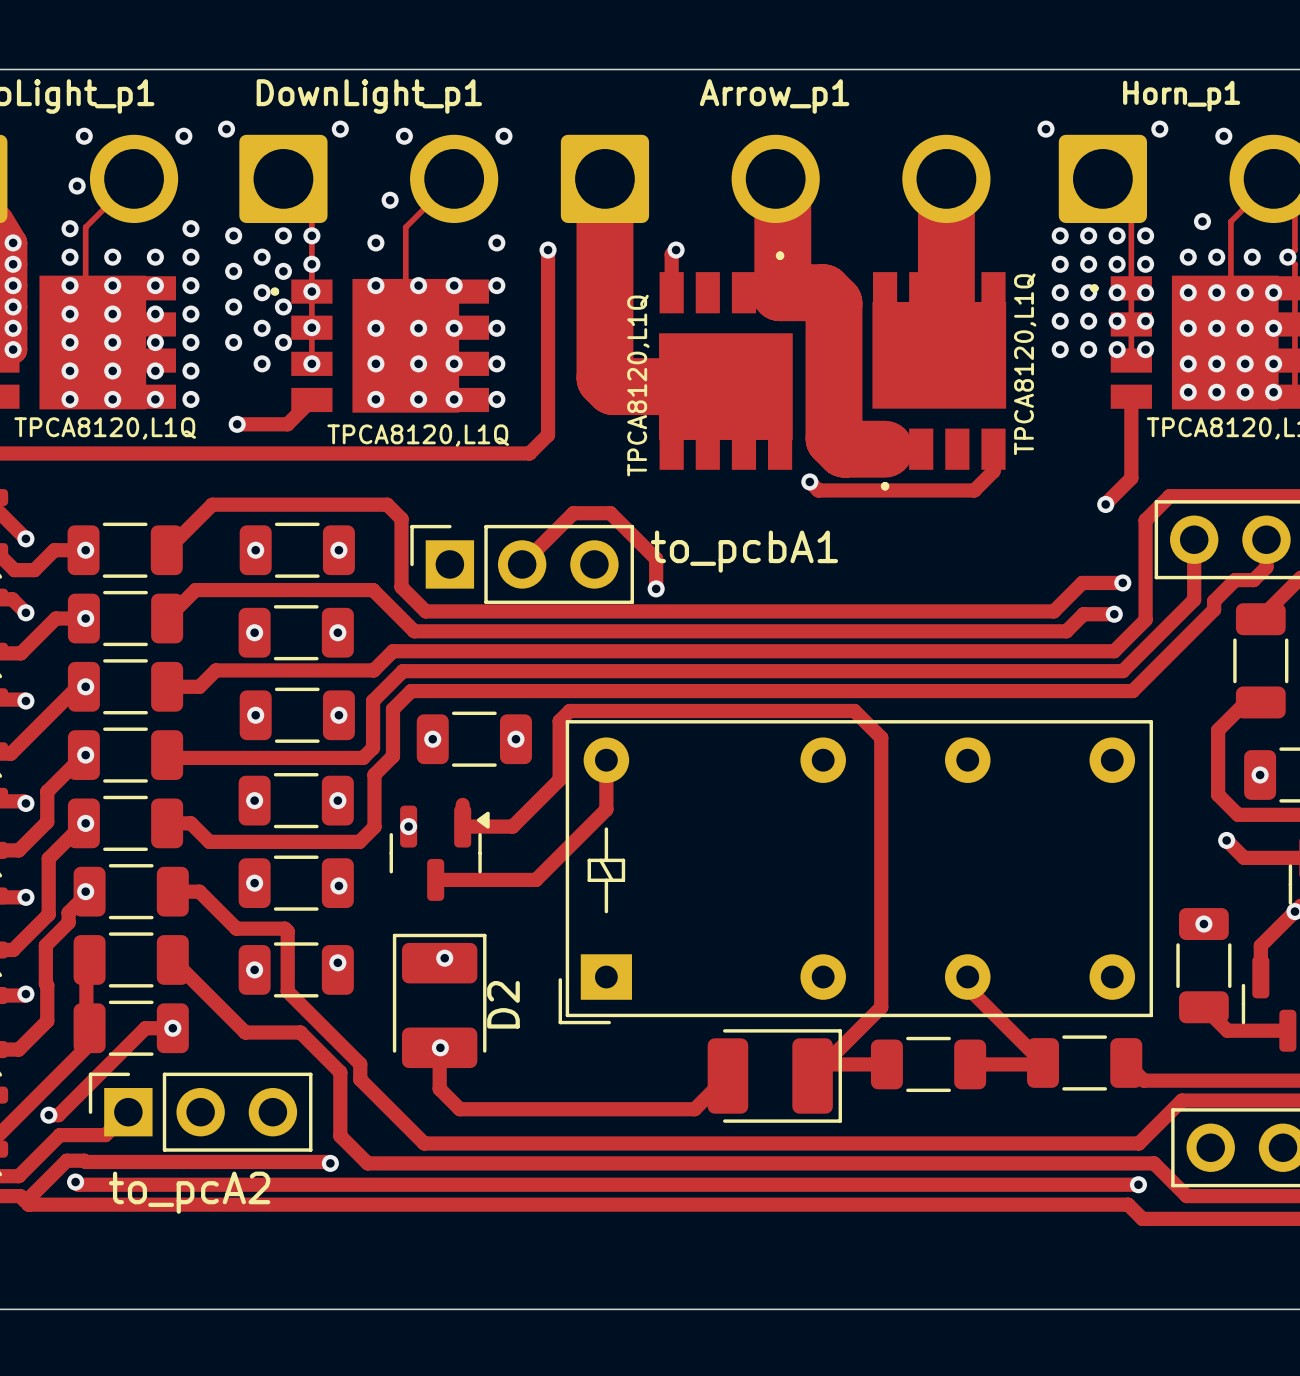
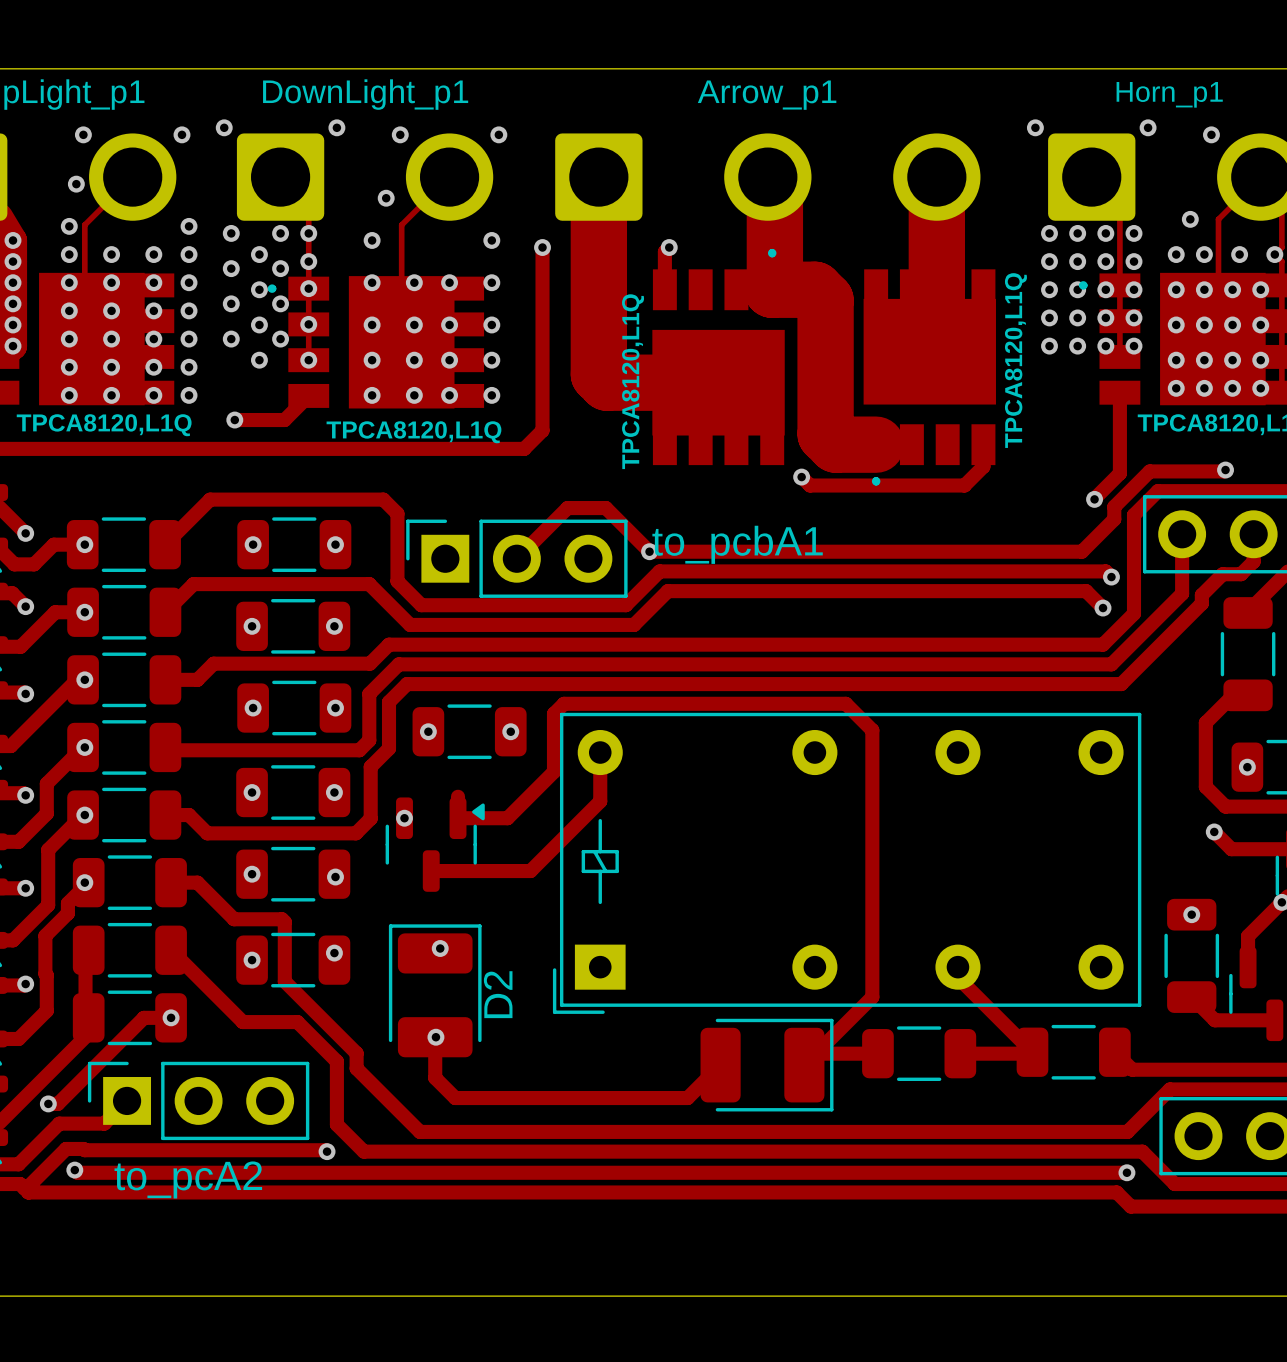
via: none -> (1225, 470)
track: (610, 513) (656, 558) (656, 588) -> (604, 508) (649, 551) (1081, 551) (1114, 519) (1114, 506) (1149, 471) (1225, 470)
track: (1122, 582) (1082, 582) (1053, 611) (632, 611) -> (1111, 577) (1105, 571) (659, 571) (625, 605)
via position: (656, 588) -> (649, 551)
track: (1114, 614) (1083, 614) (1066, 631) (640, 631) -> (1103, 608) (1086, 591) (667, 591) (634, 624)

